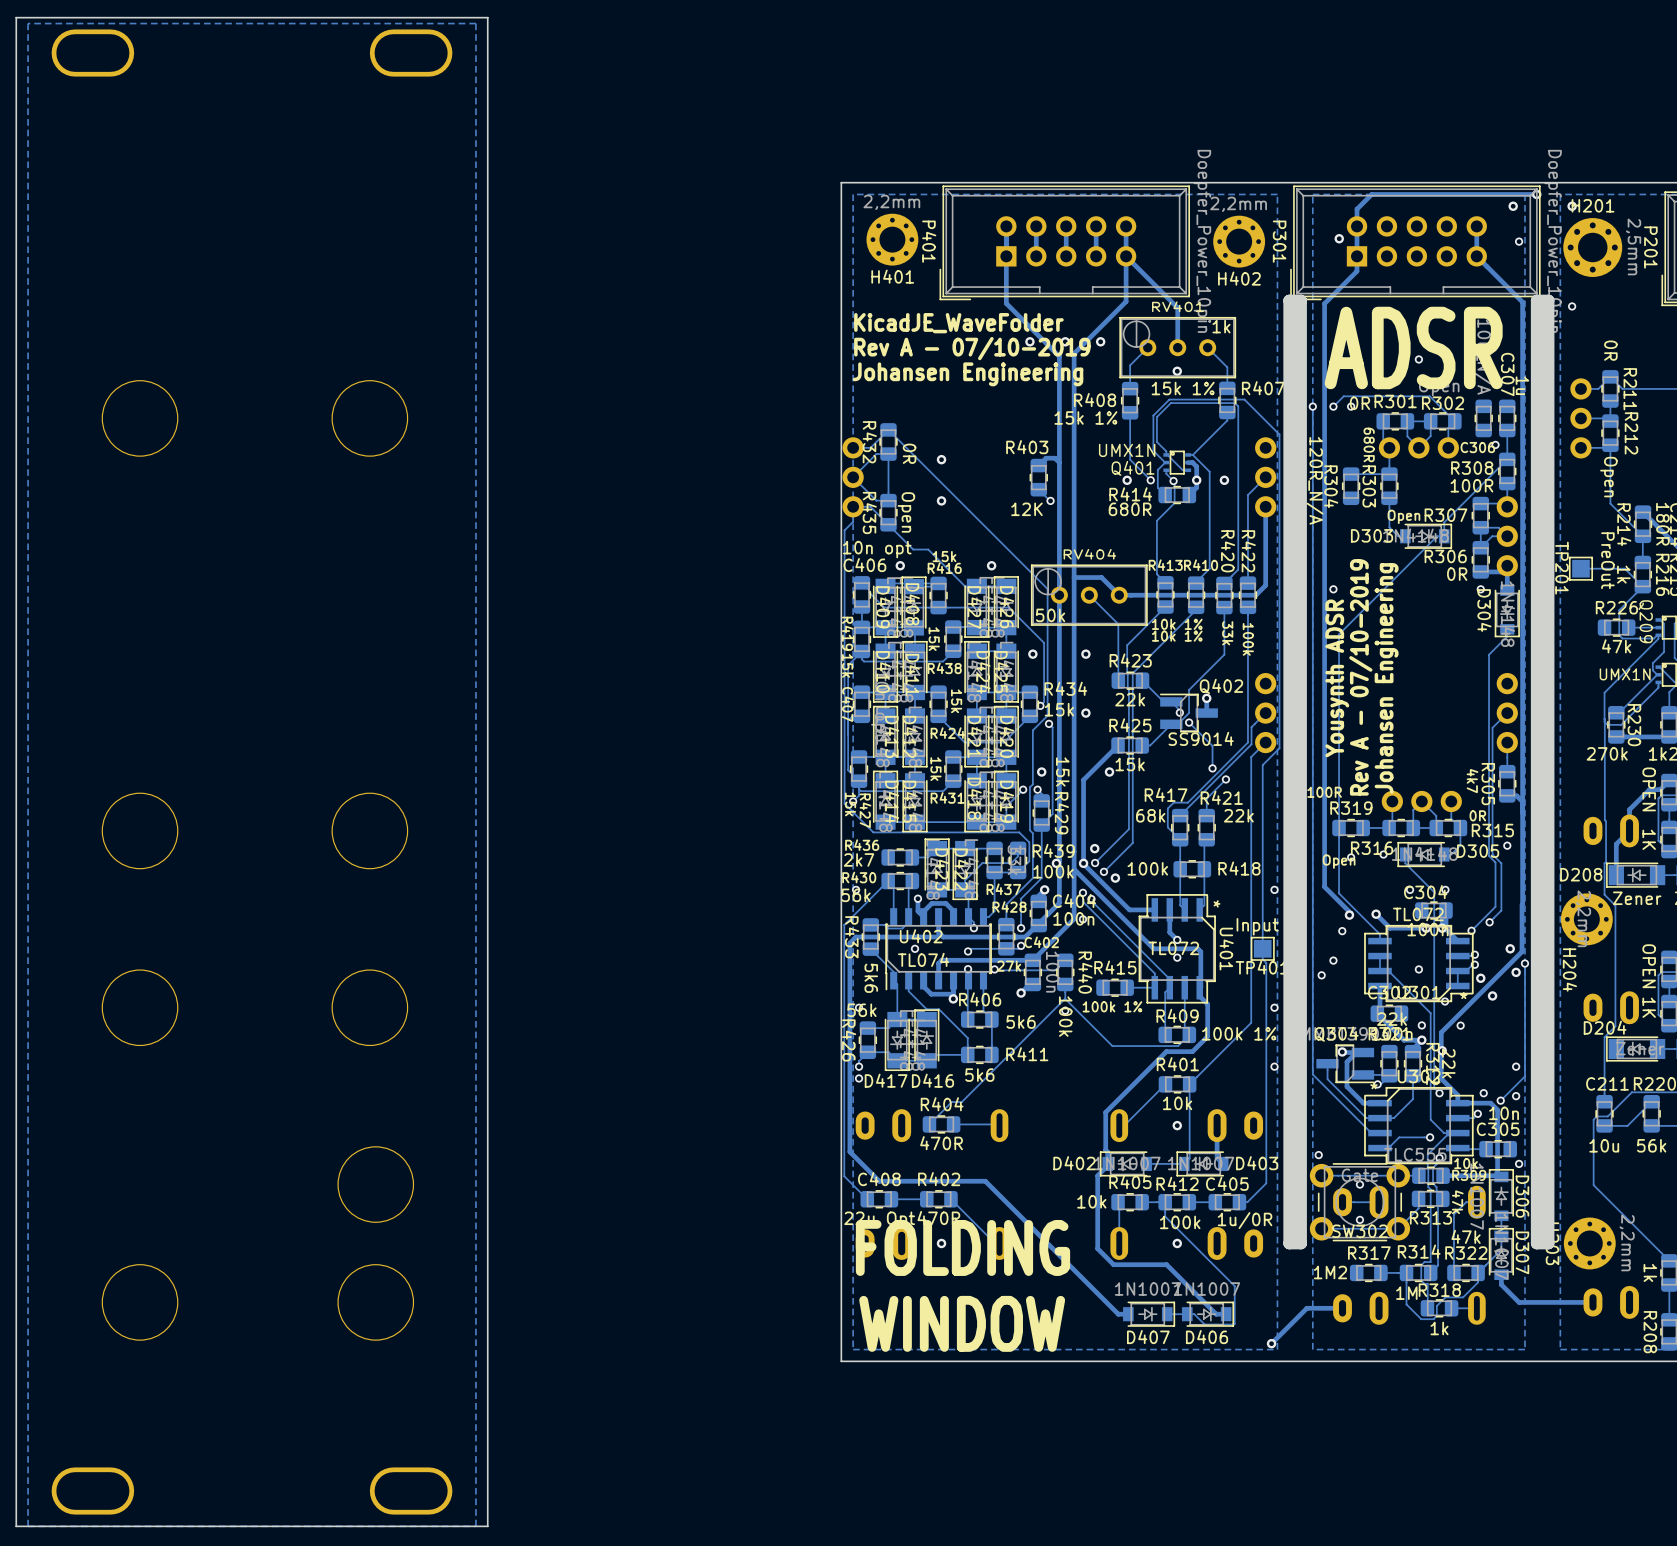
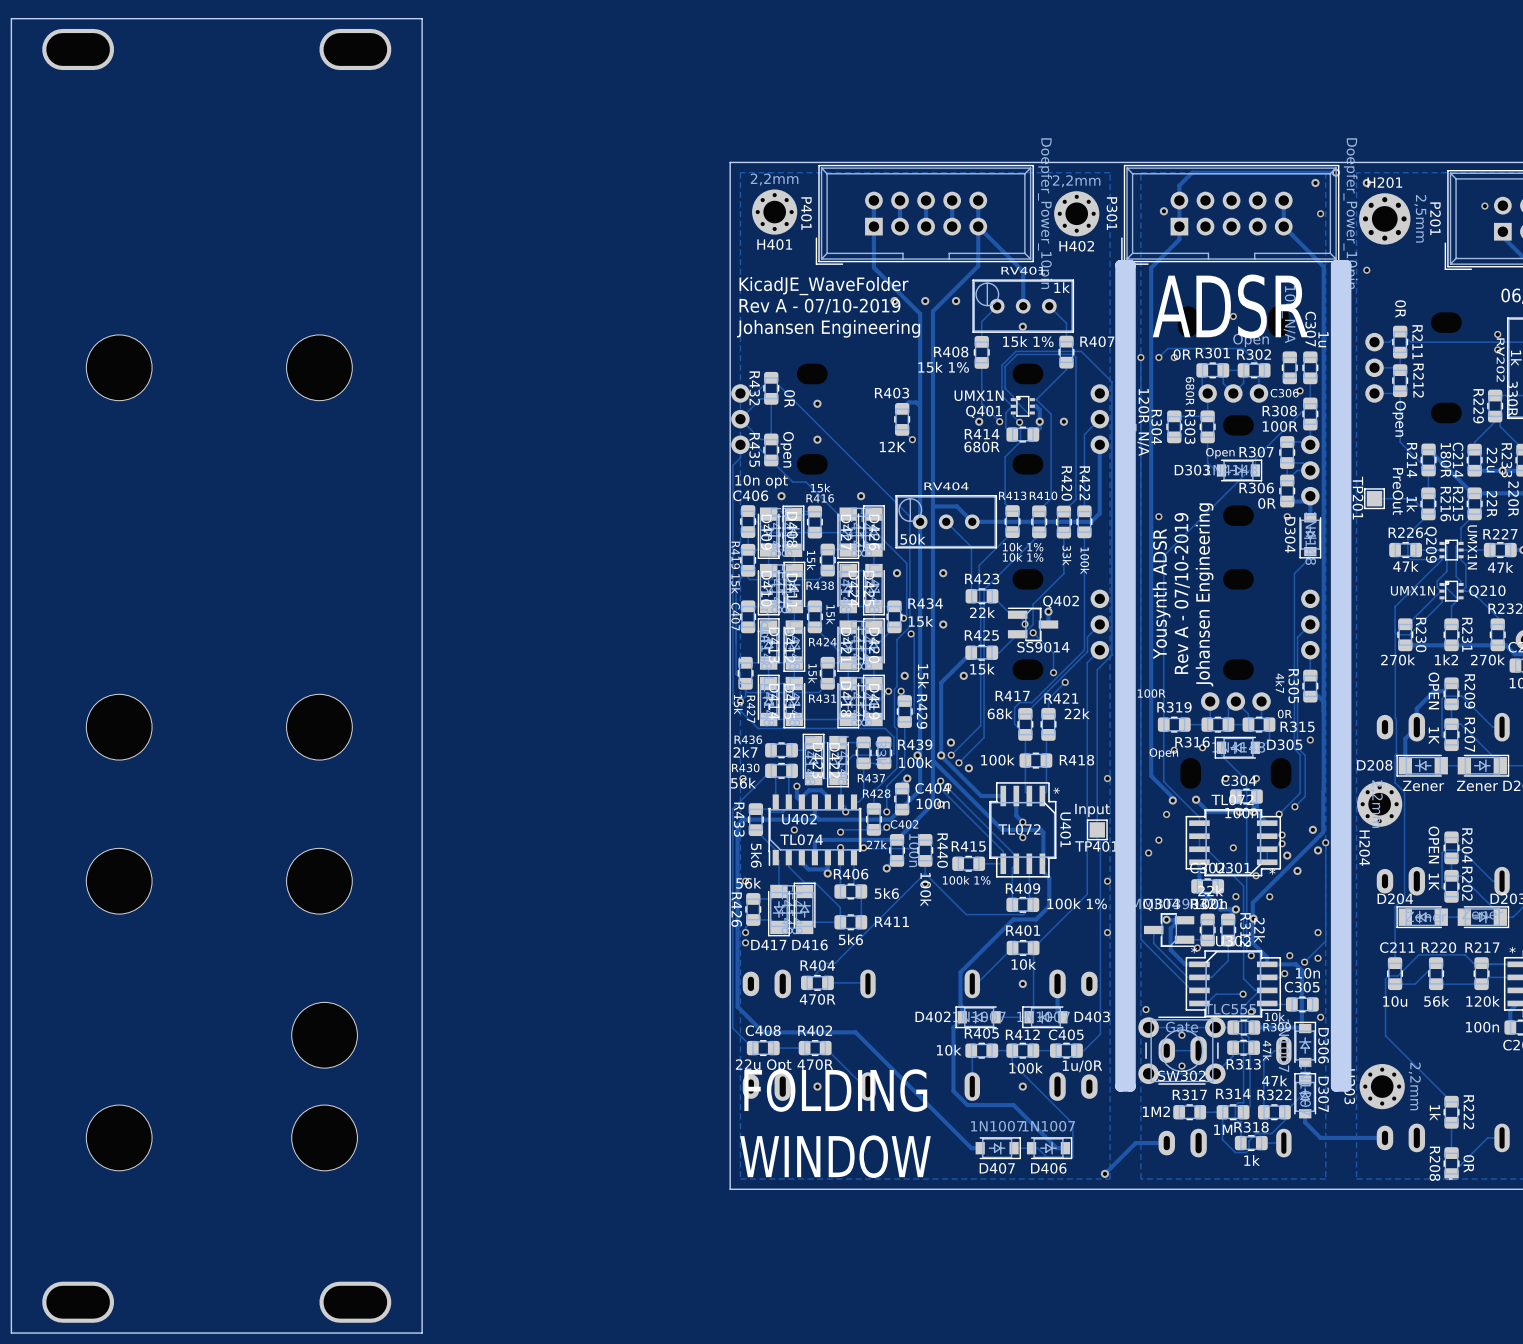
zone outline: (475, 23) (475, 1526) (28, 1526) (28, 23) (475, 23) -> none

